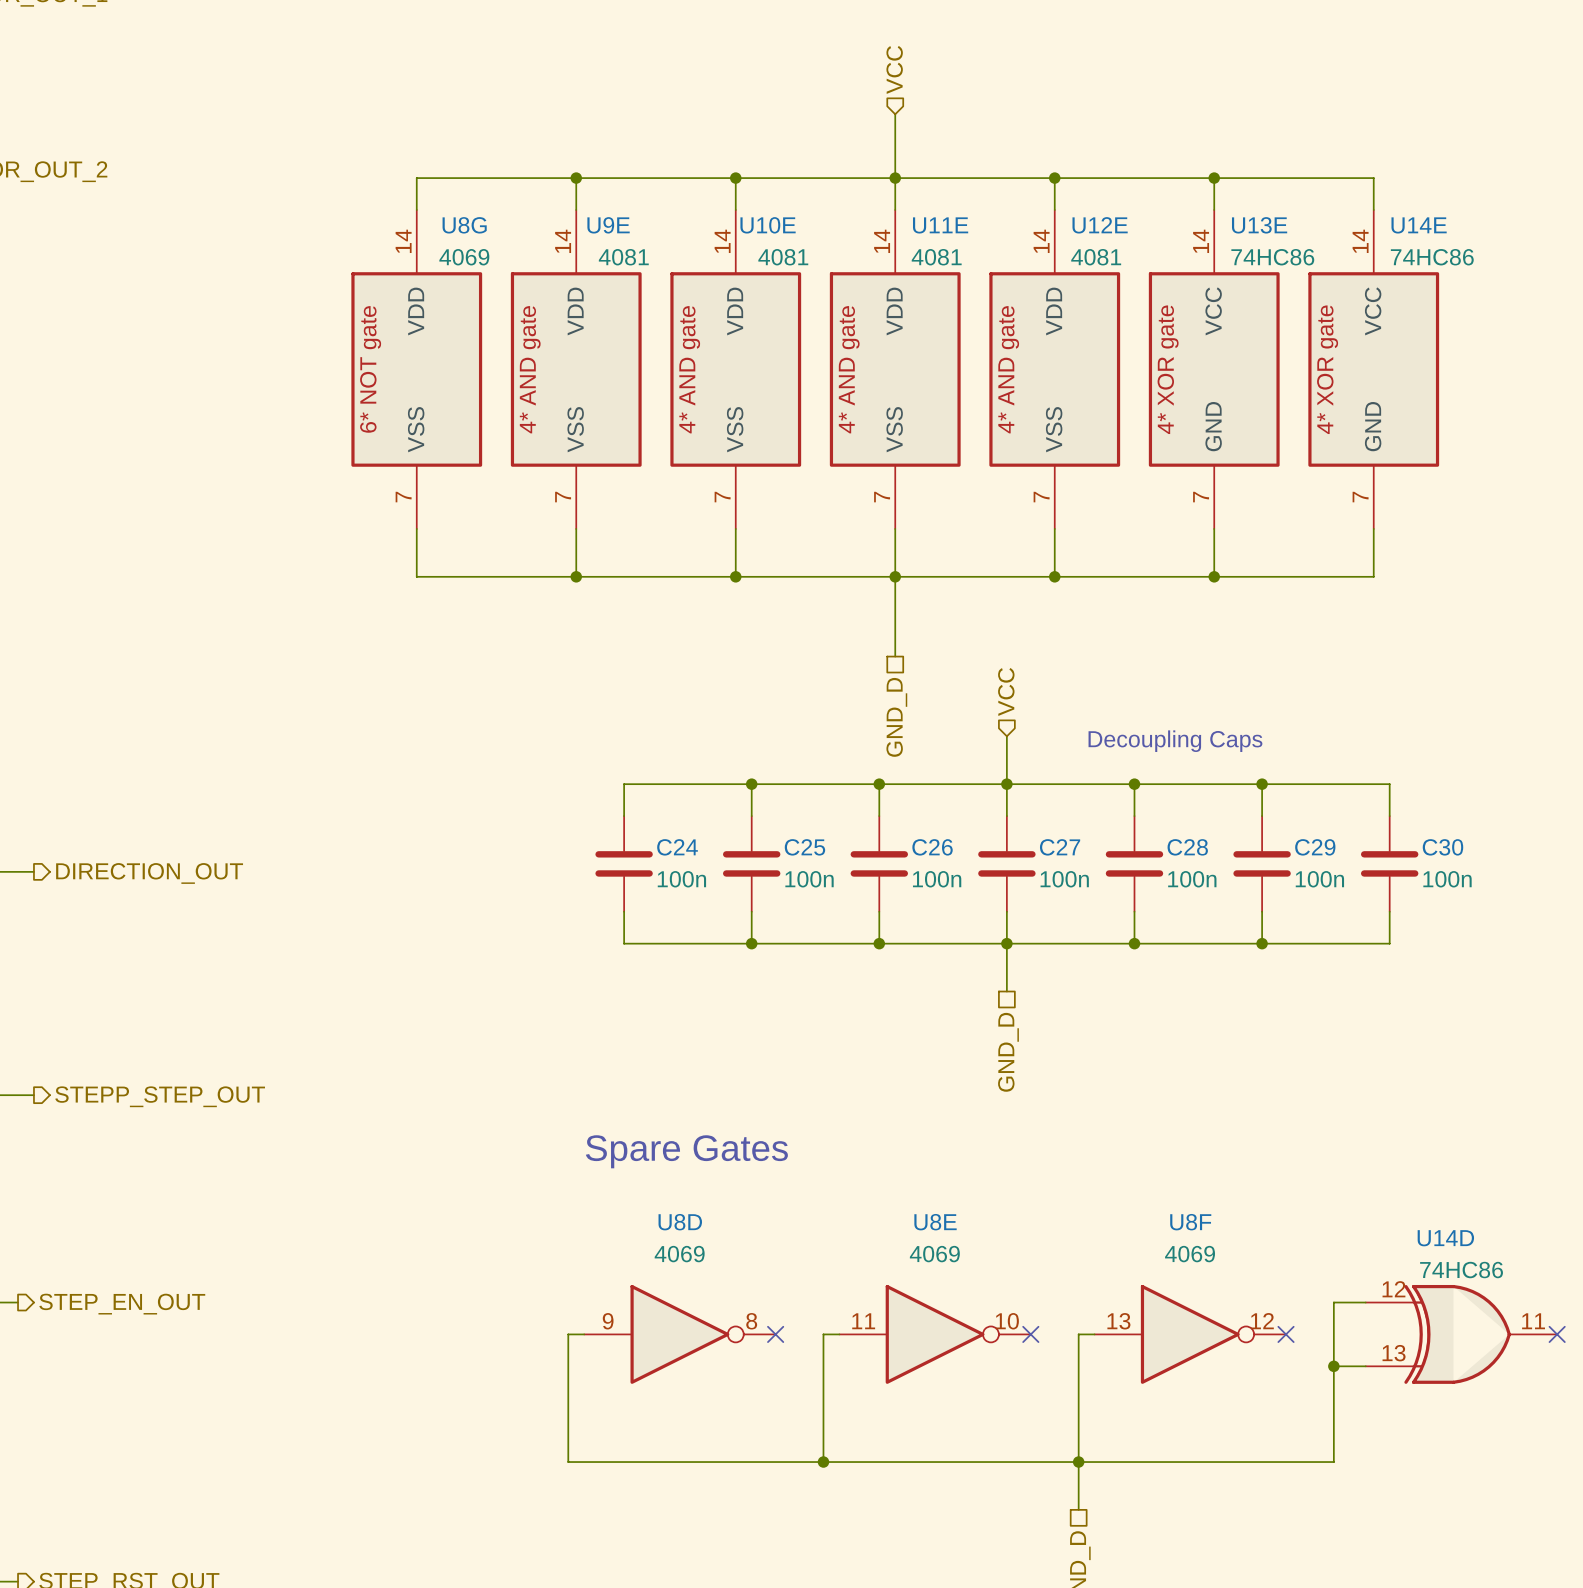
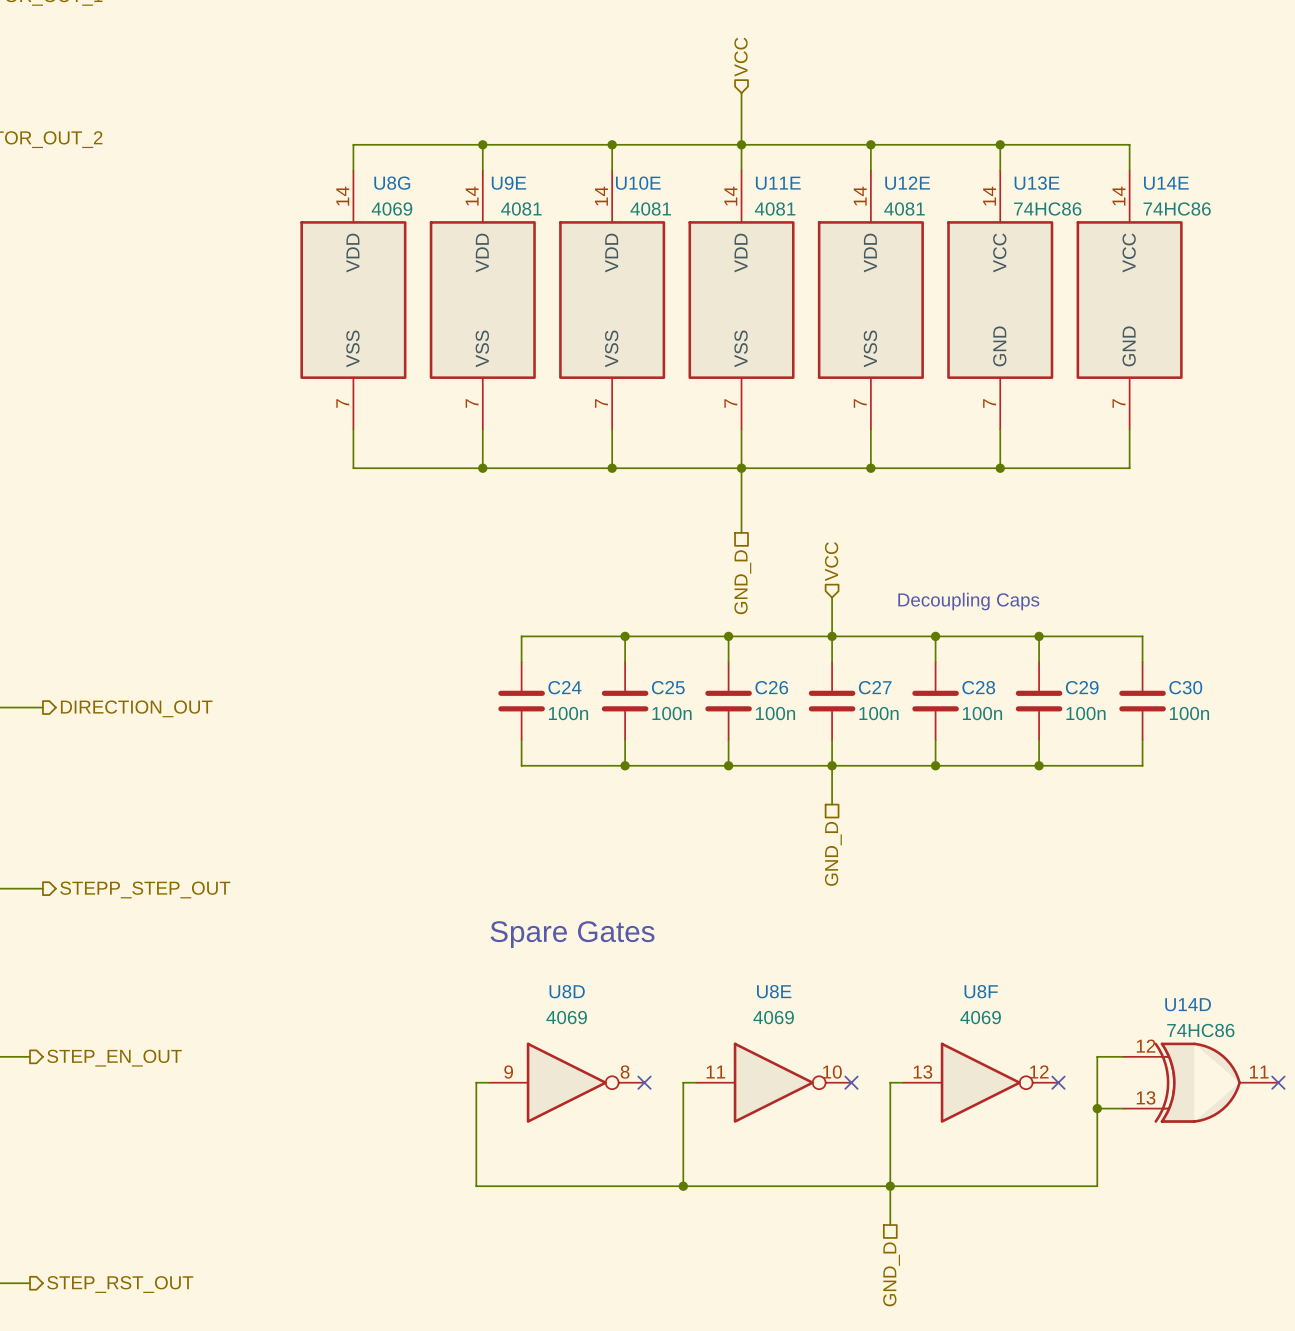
U8G text: 6* NOT gate (370, 369) -> none
U9E text: 4* AND gate (530, 369) -> none
U10E text: 4* AND gate (689, 369) -> none
U11E text: 4* AND gate (849, 369) -> none
U12E text: 4* AND gate (1008, 369) -> none
U13E text: 4* XOR gate (1168, 369) -> none
U14E text: 4* XOR gate (1327, 369) -> none

